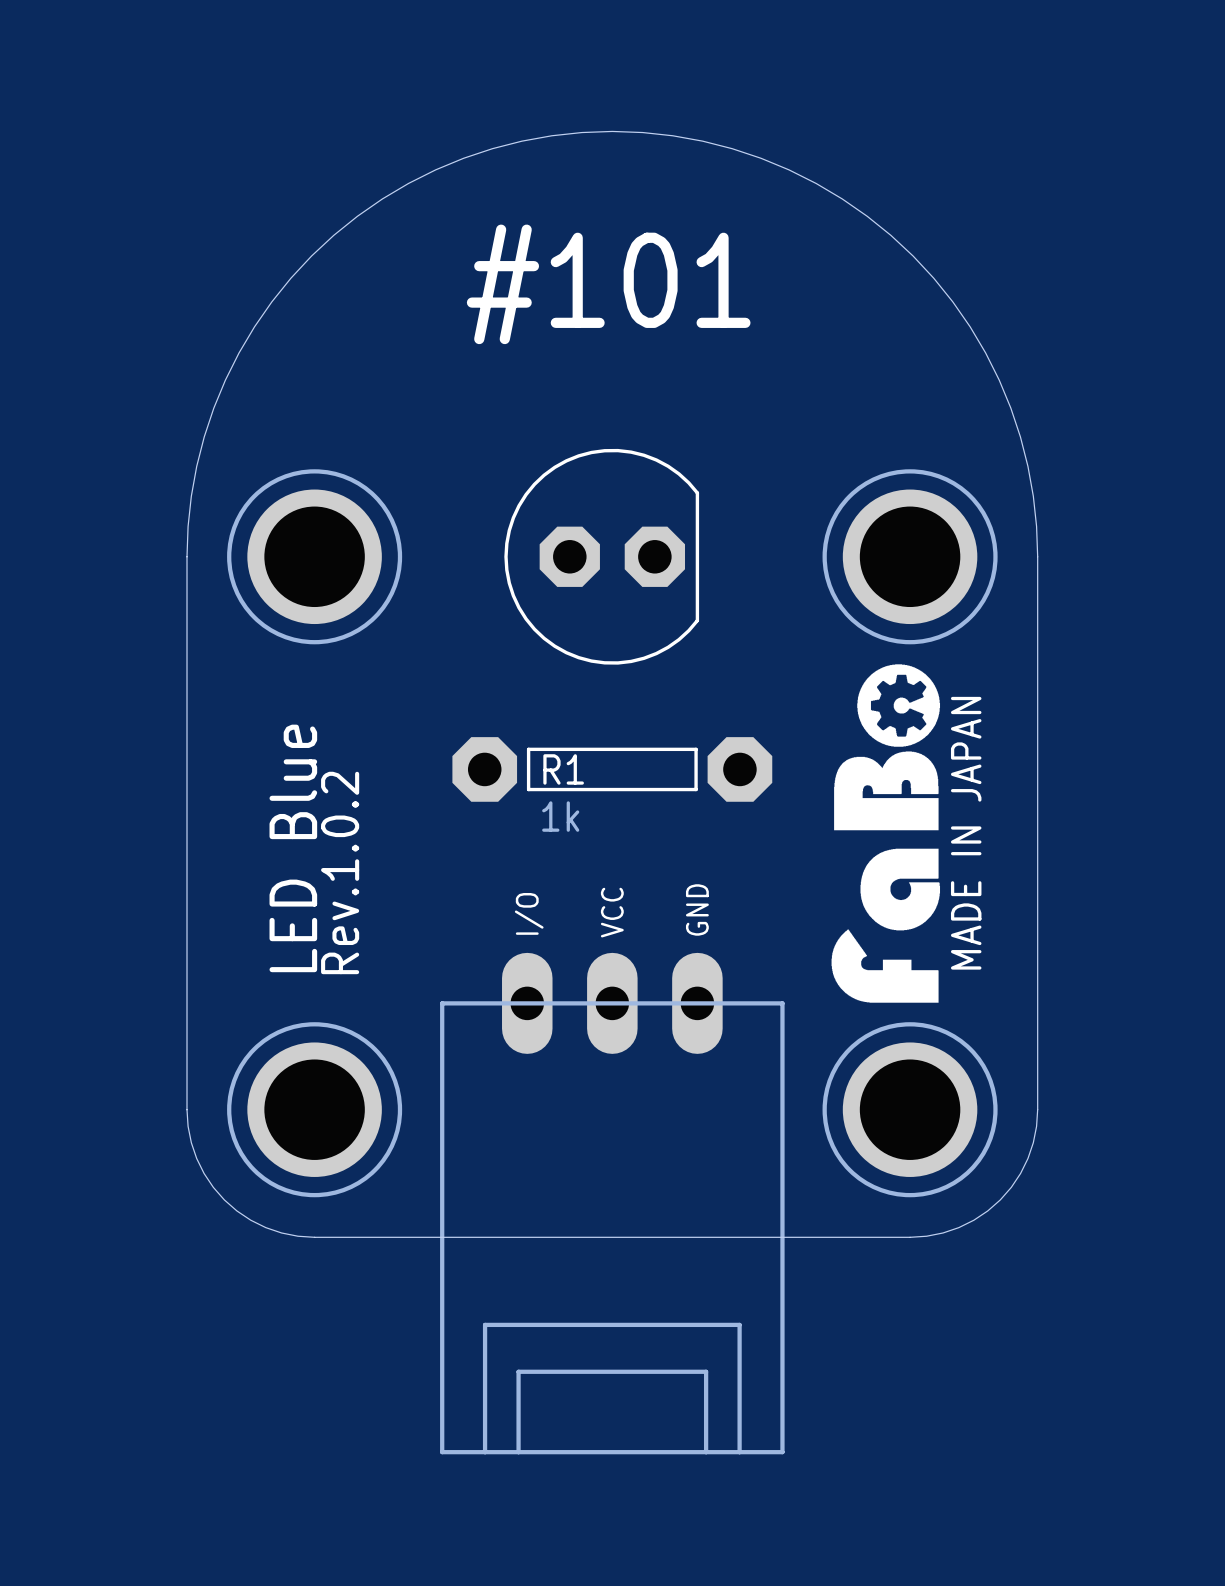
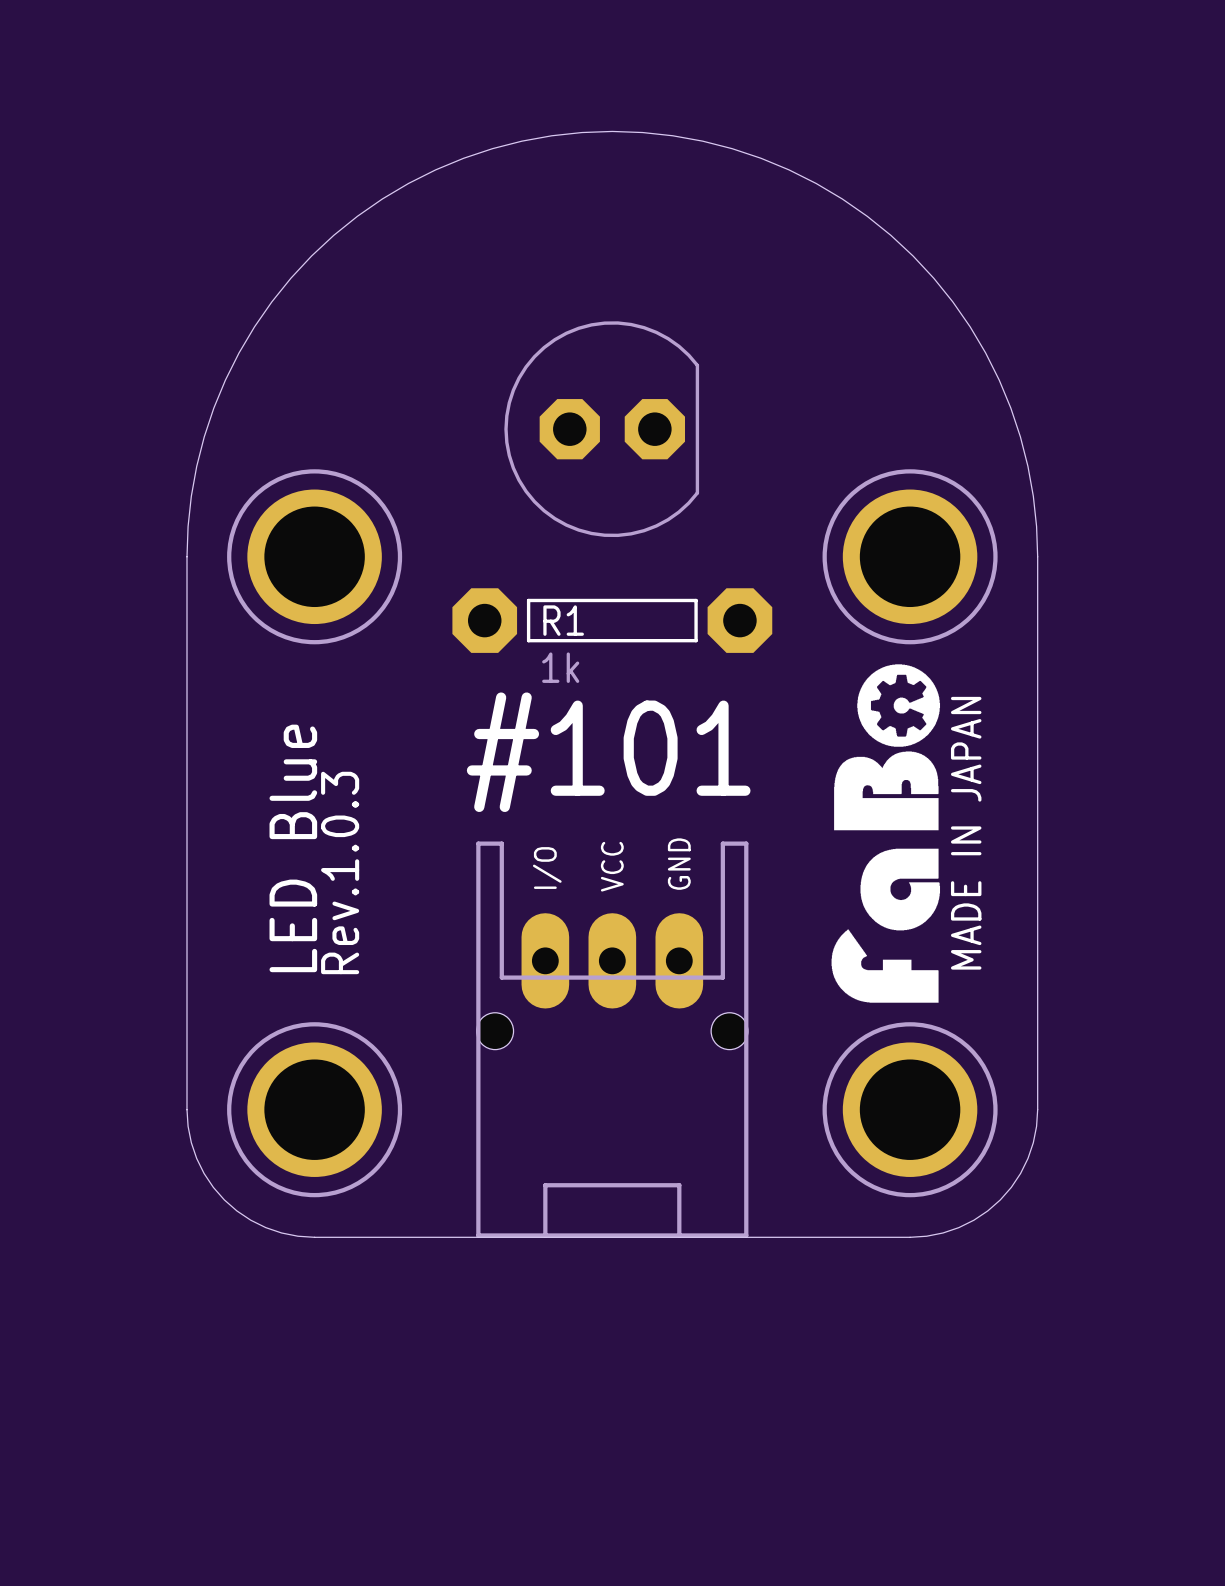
text position: #101 (608, 284) -> #101 (608, 752)
part: none -> (601, 429)
part: (601, 556) -> none
part: none -> (612, 684)
R1 position: (612, 769) -> (612, 620)
part: (612, 792) -> none
text: Rev.1.0.2 (340, 872) -> Rev.1.0.3 (340, 872)

